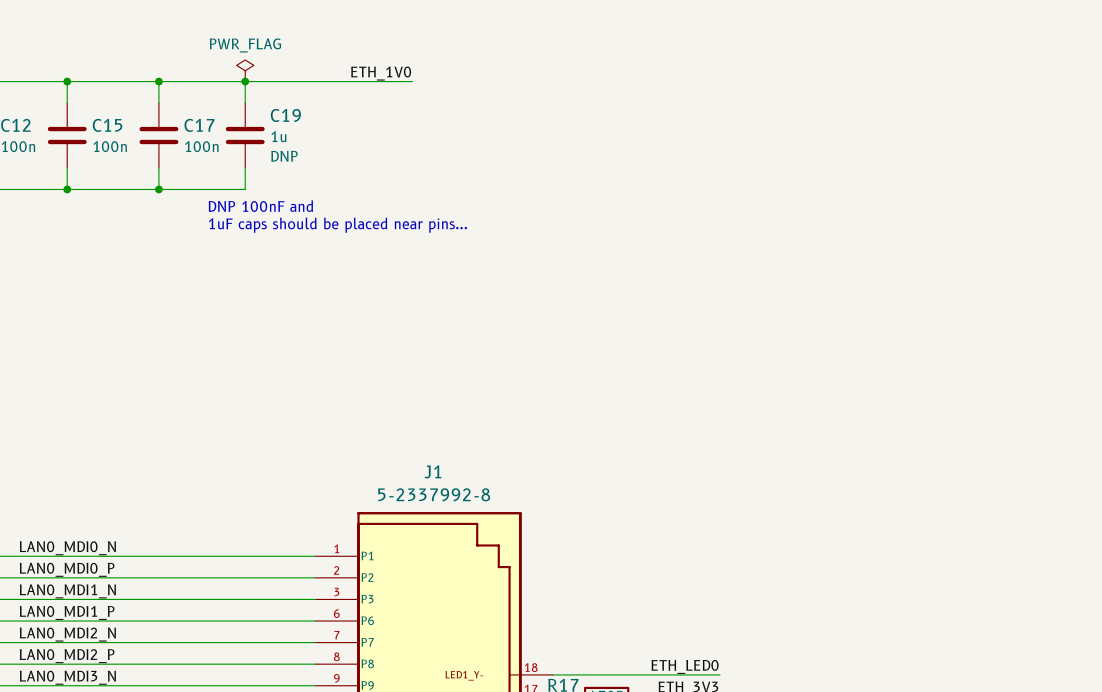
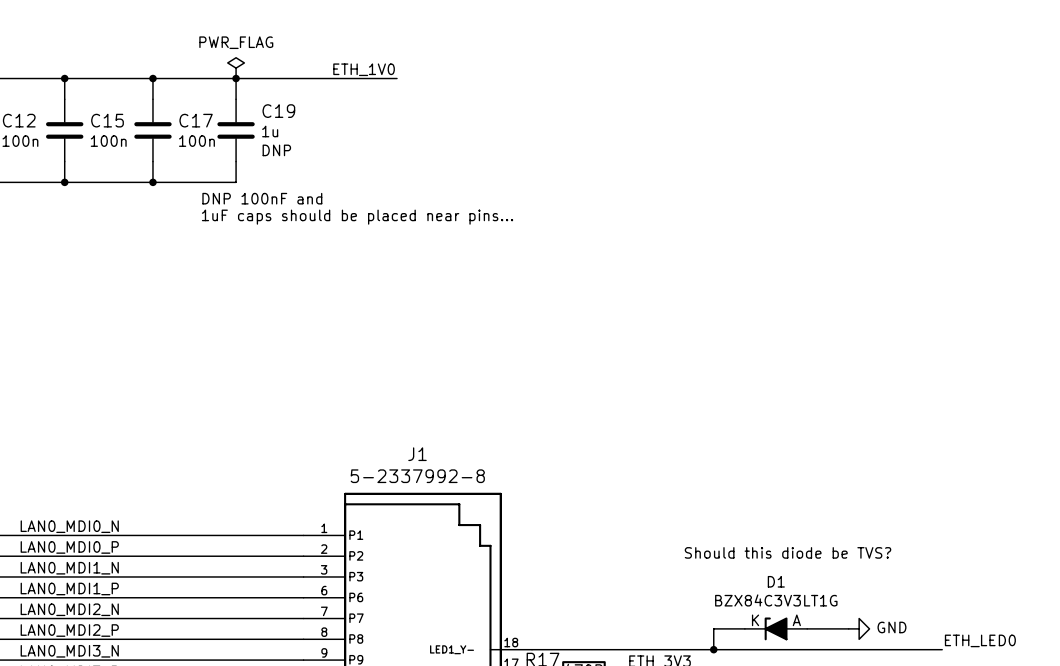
text: none -> Should this diode be TVS? (788, 552)
wire: none -> (744, 628) (713, 628) (713, 649)
D1: none -> BZX84C3V3LT1G (776, 628)
wire: none -> (807, 628) (848, 628)
power symbol: none -> GND (859, 628)
label: ETH_LED0 (685, 666) -> none
label: none -> ETH_LED0 (980, 640)
wire: none -> (692, 649) (942, 649)
junction: none -> (713, 649)

